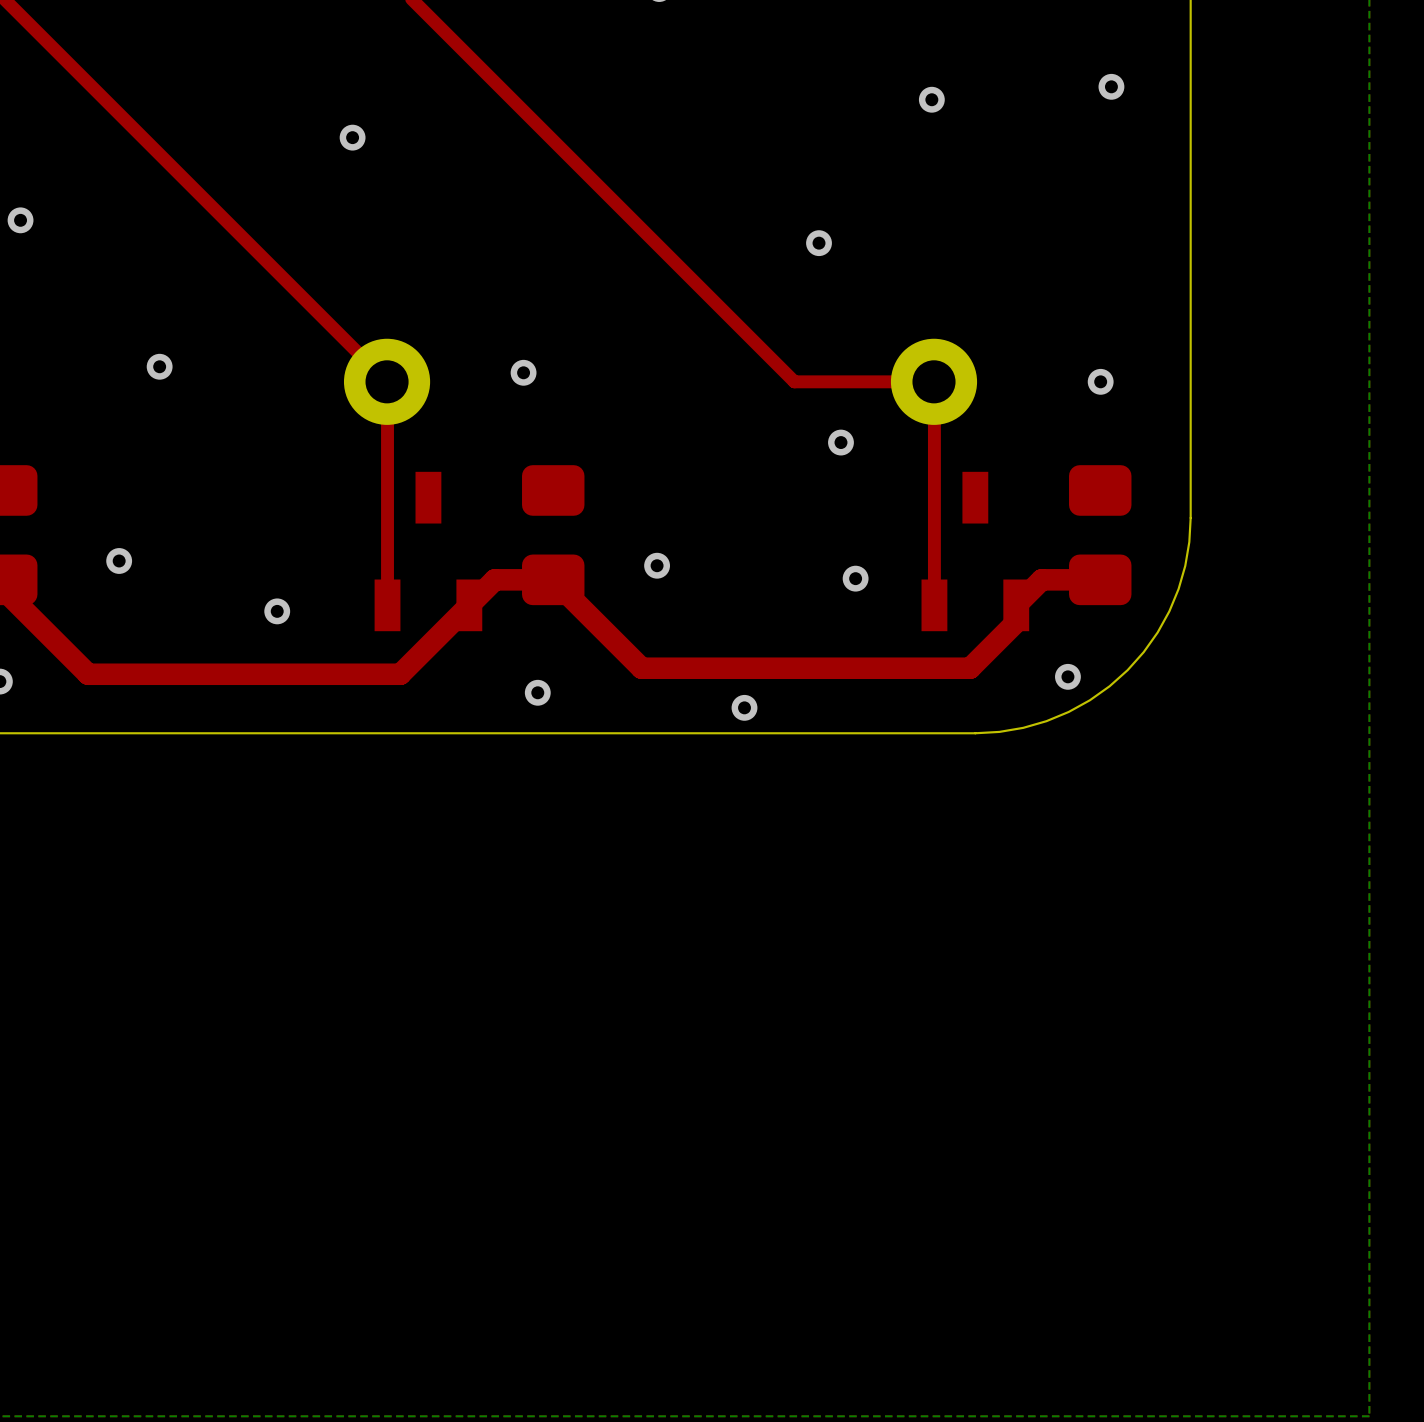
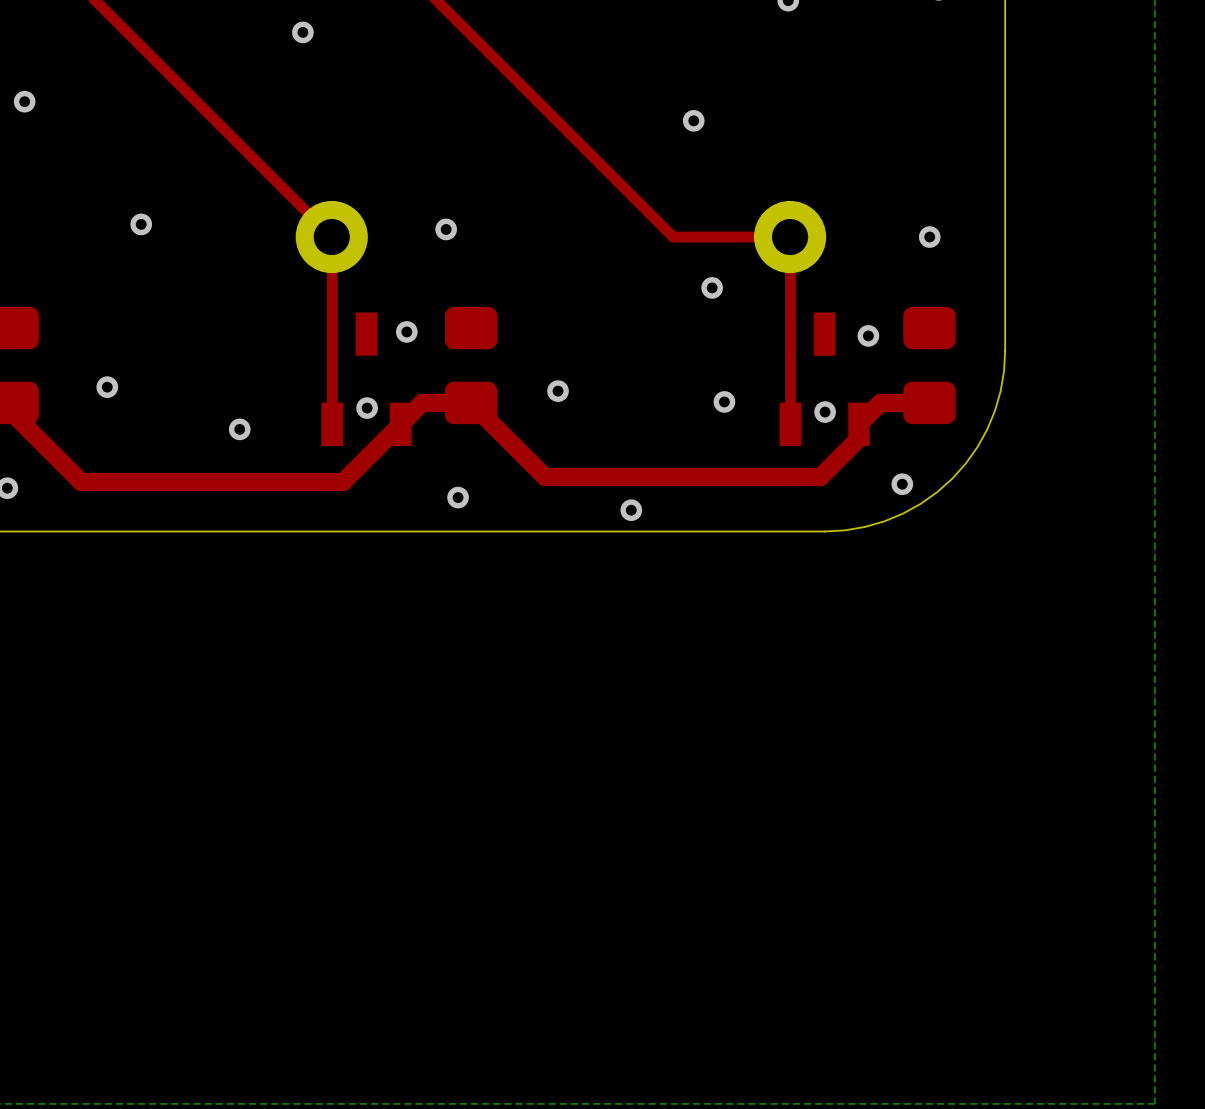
via: none -> (406, 331)
via: none -> (868, 335)
via: none -> (367, 408)
via: none -> (825, 412)

